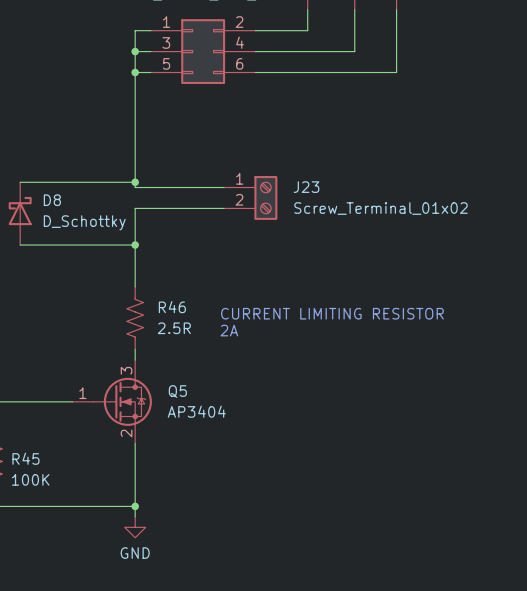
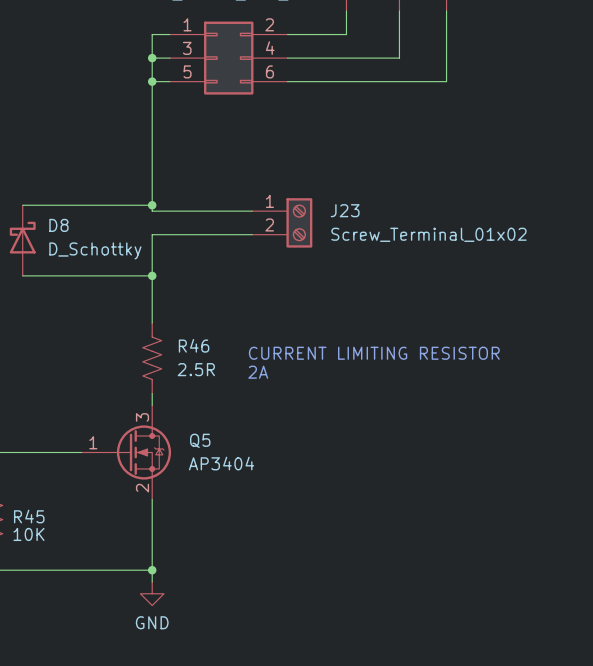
R45 value: 100K (30, 479) -> 10K (28, 534)

